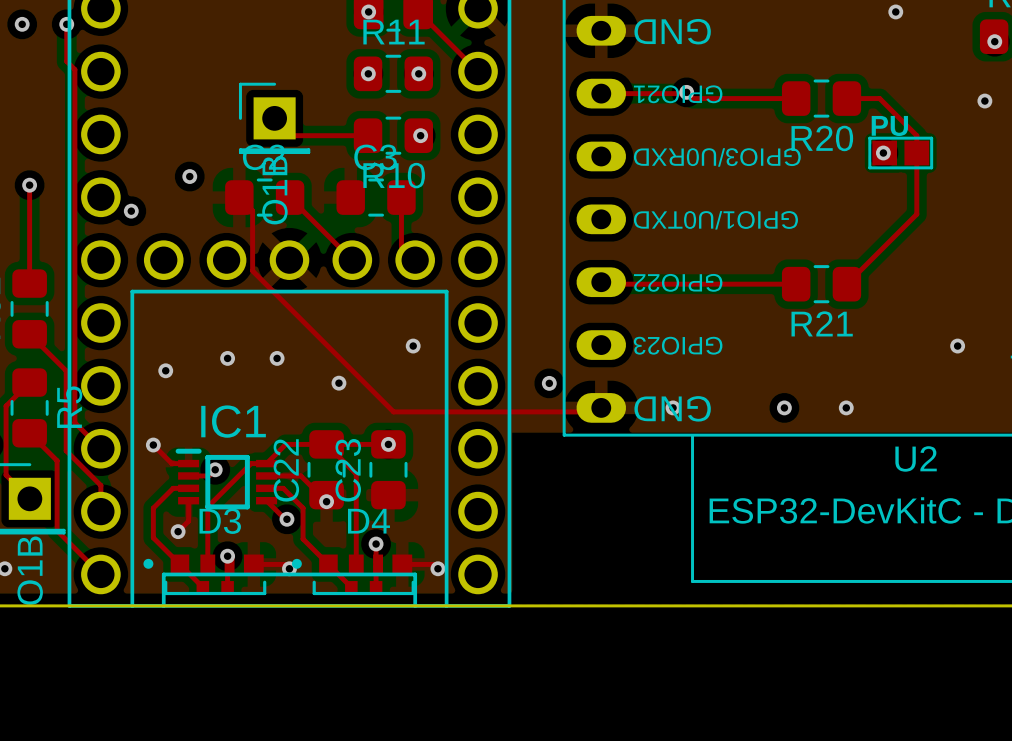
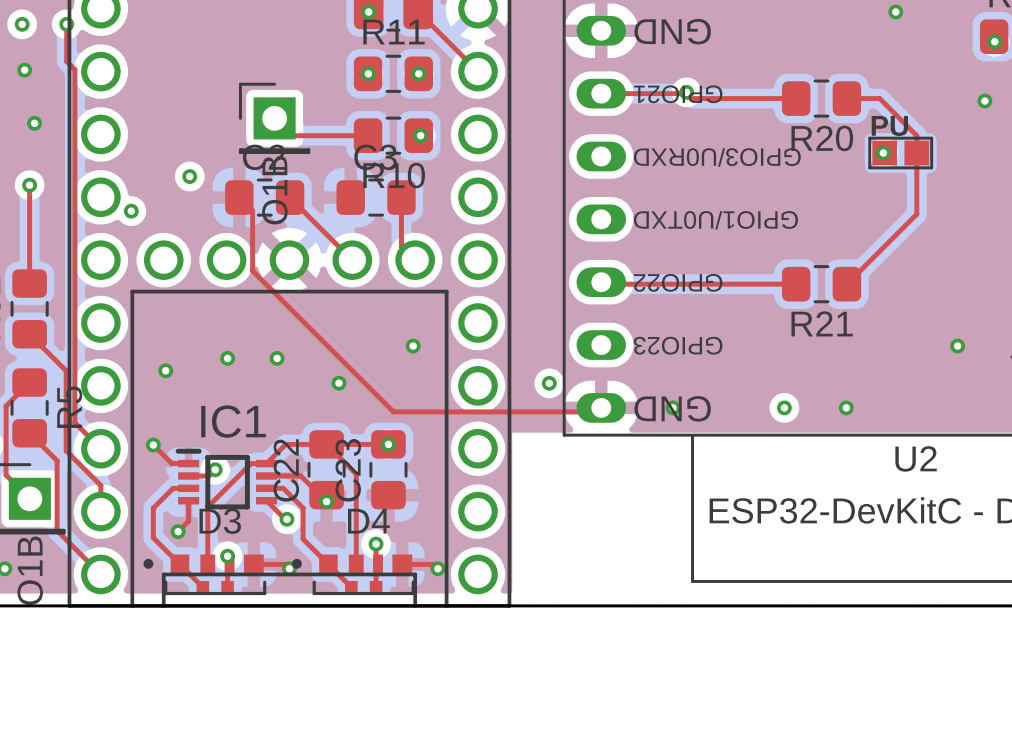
via: none -> (24, 70)
via: none -> (34, 123)

